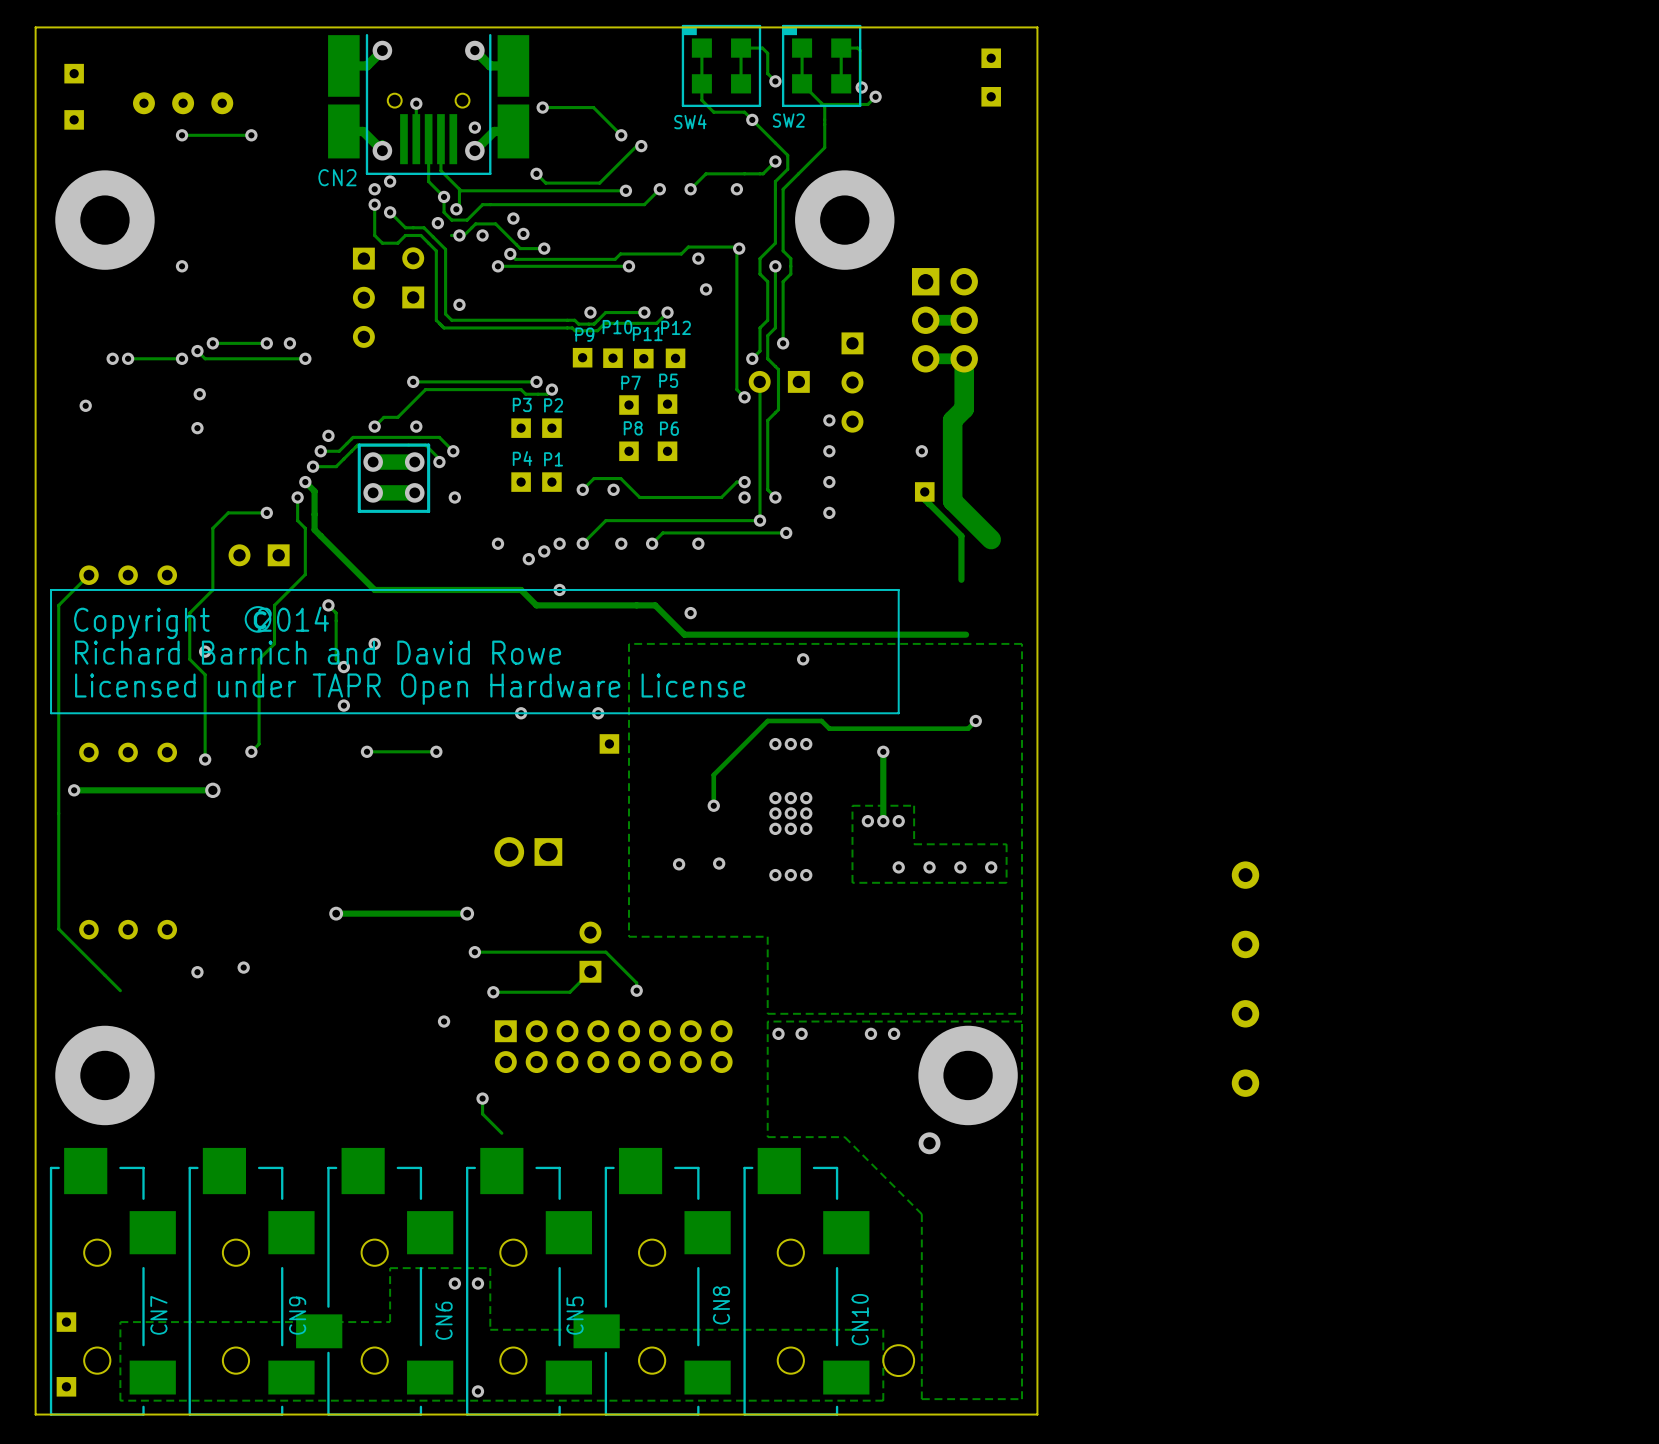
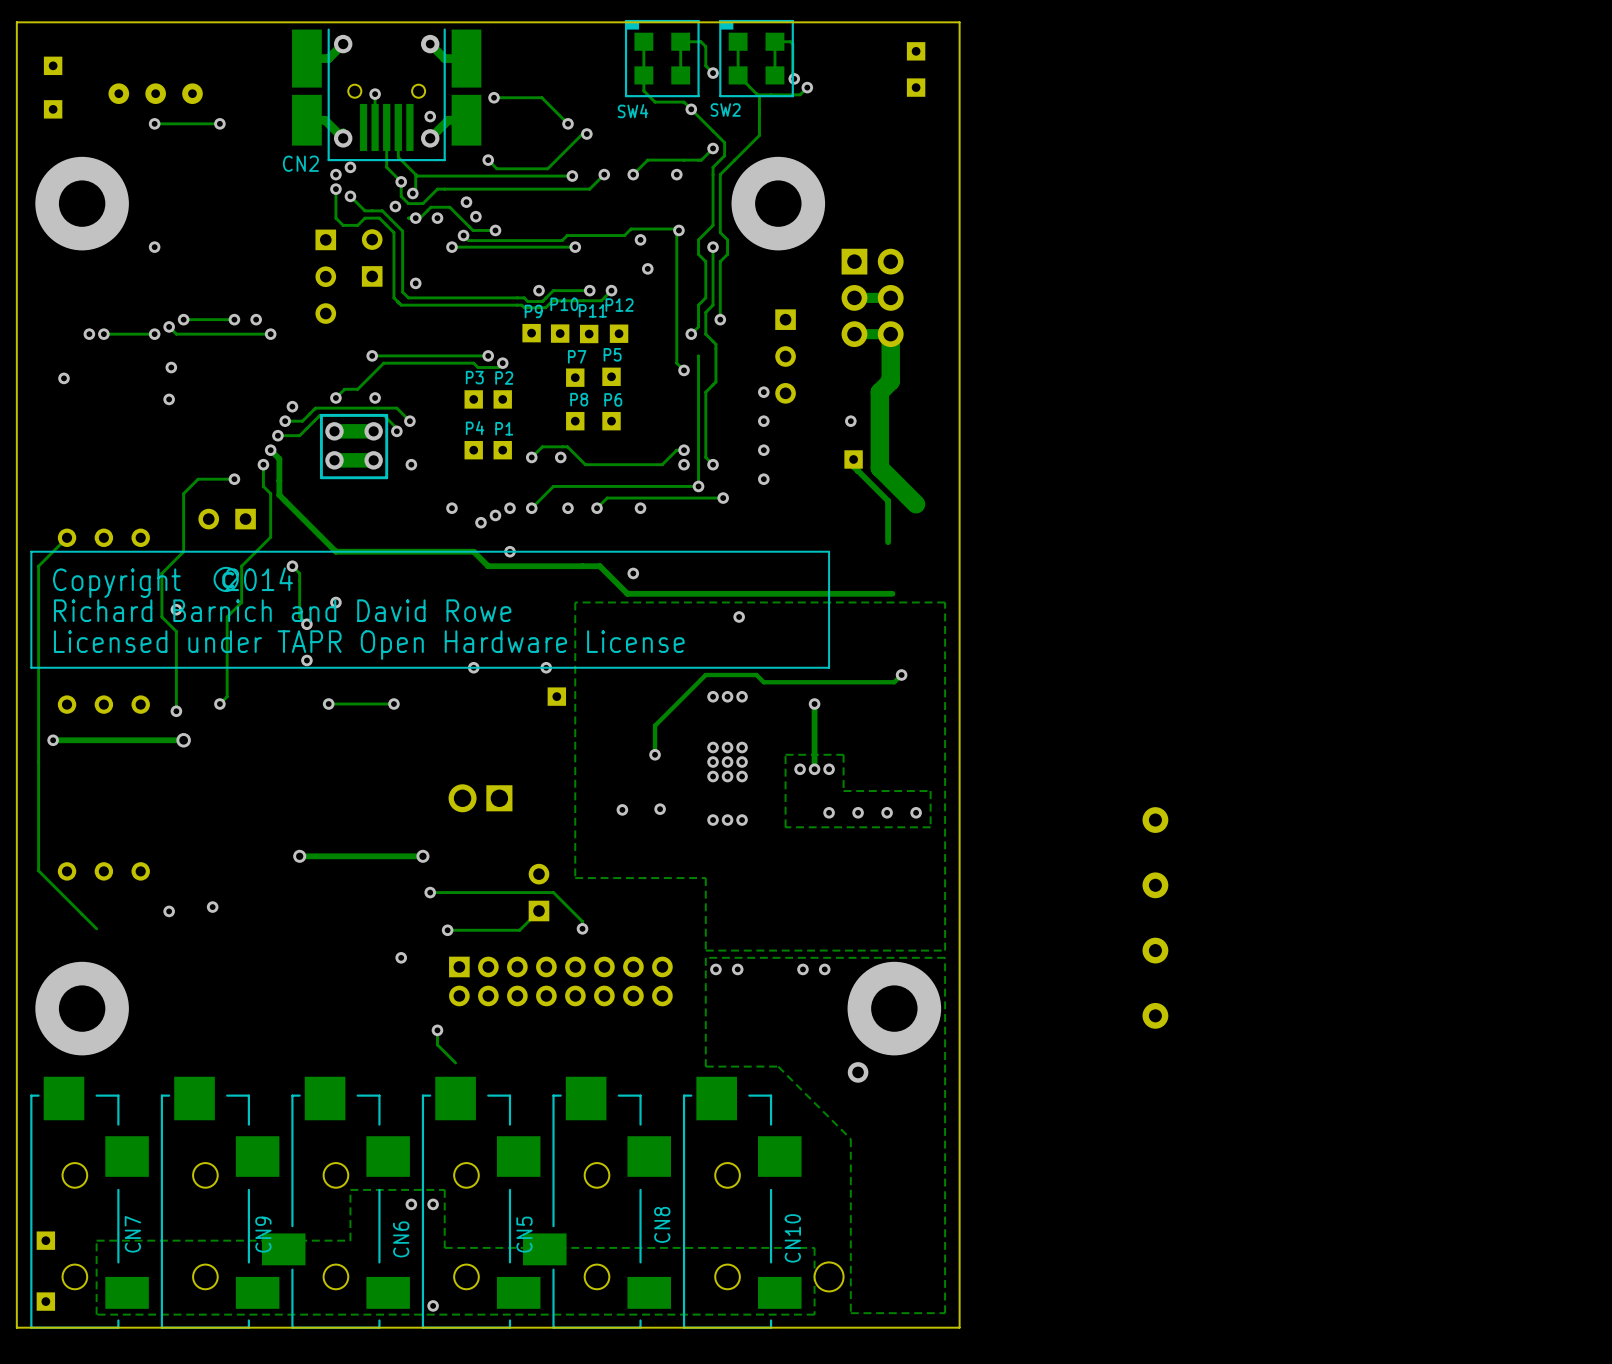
part: (779, 381) -> none

